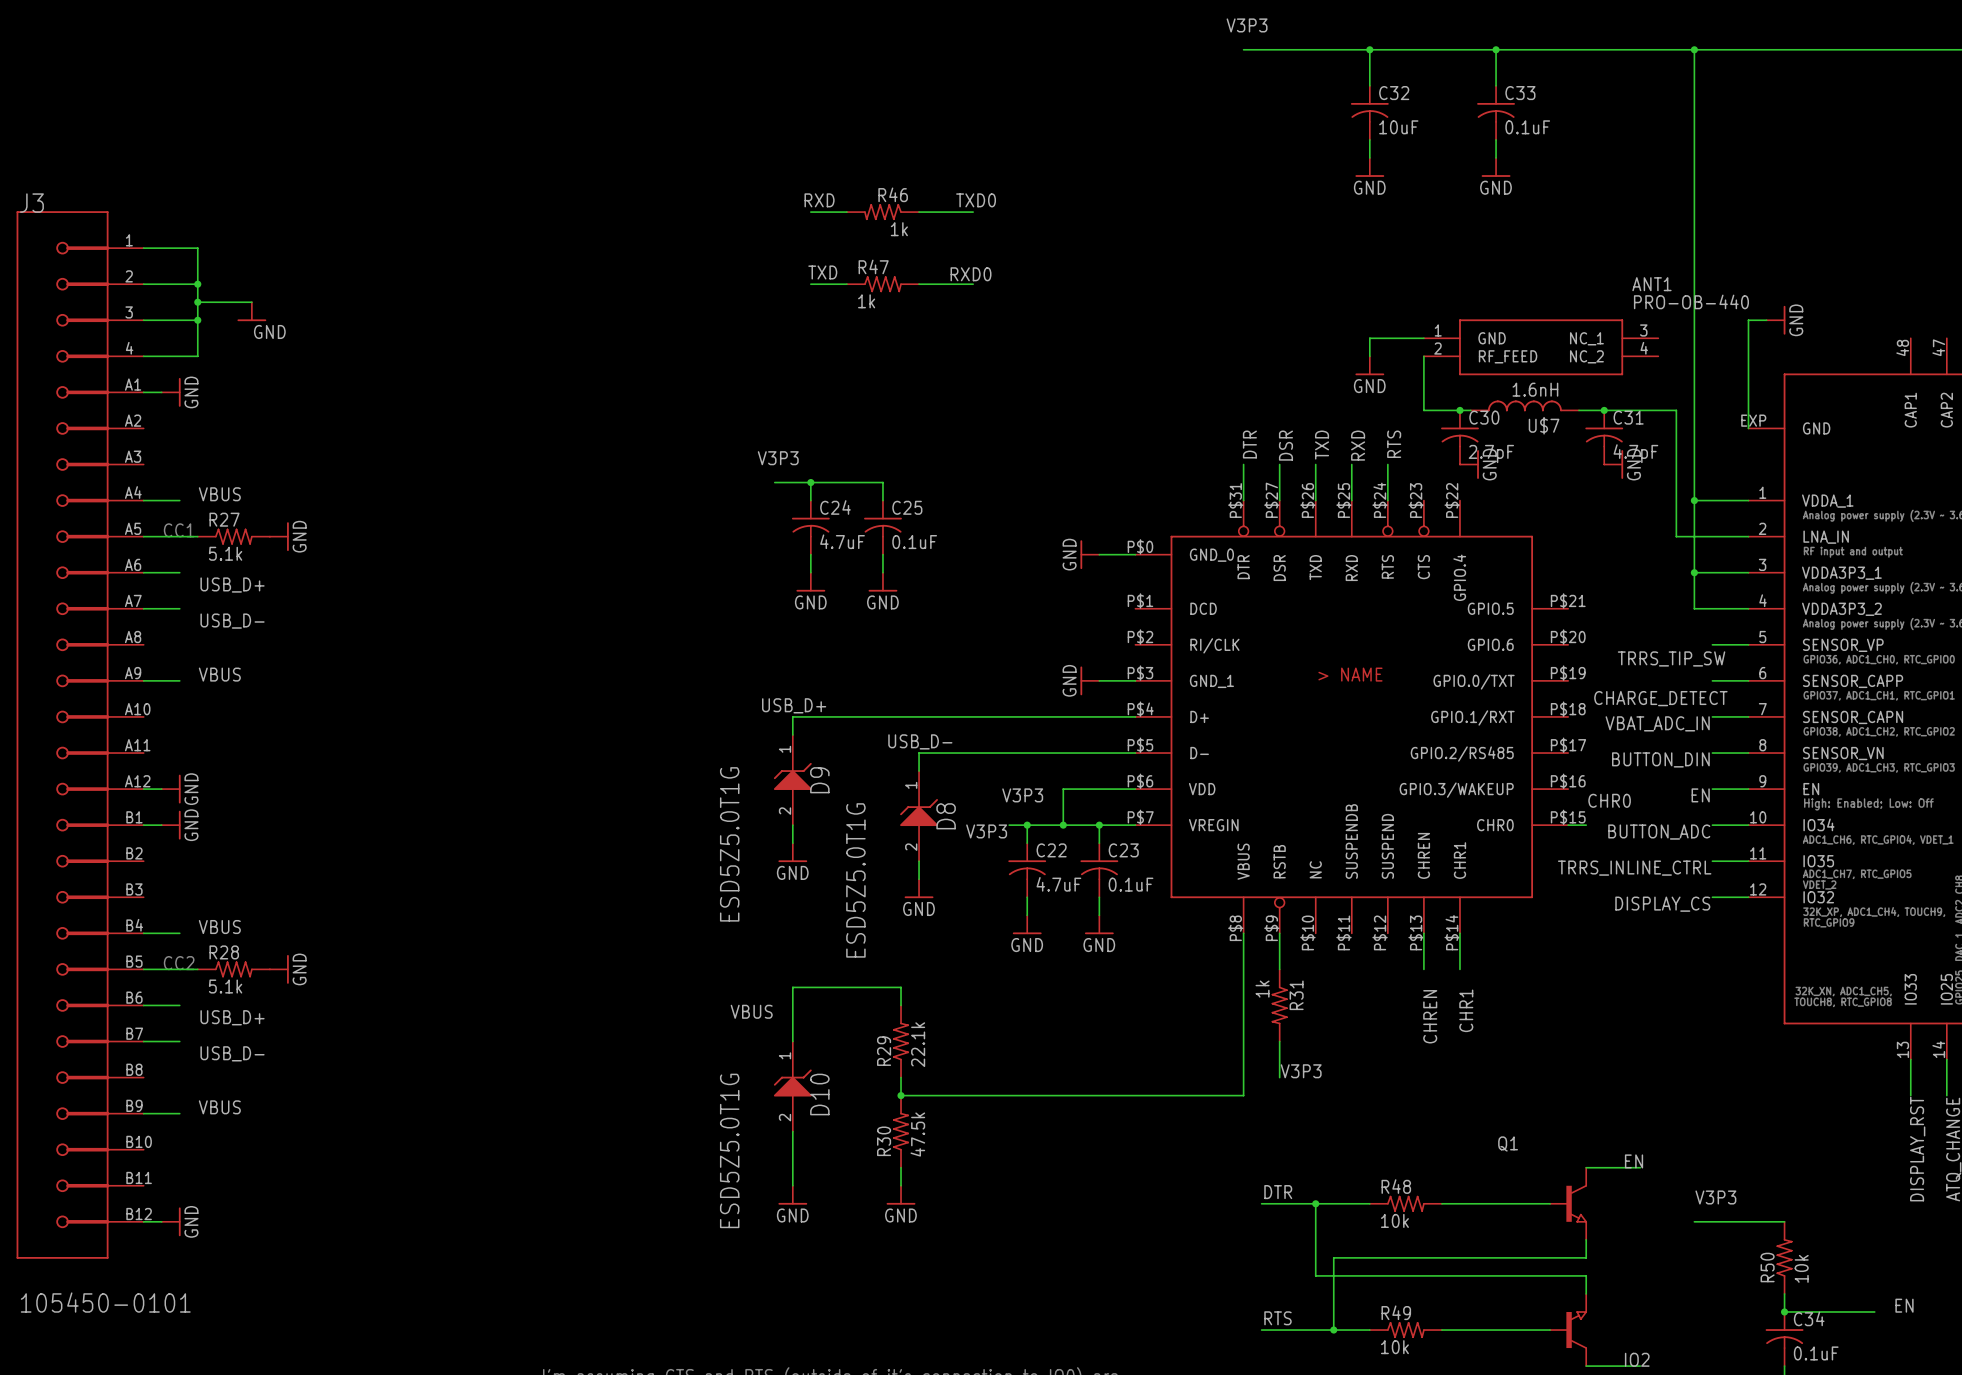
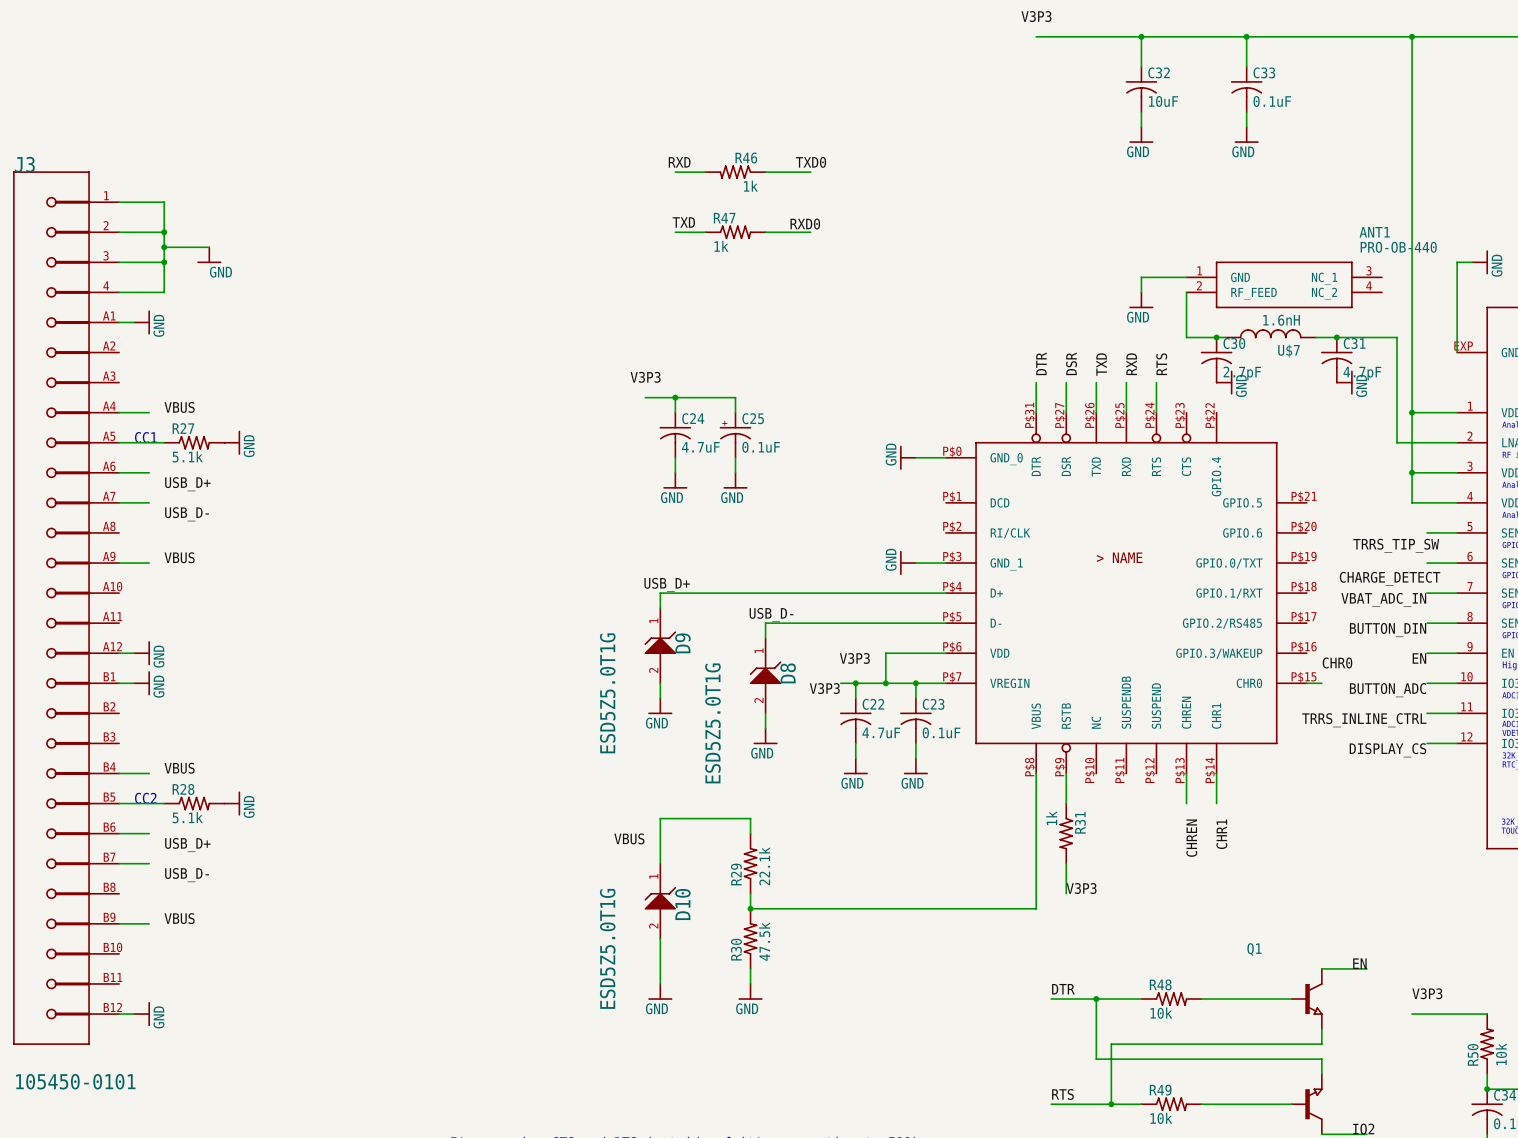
C25 symbol: [864, 500, 902, 555] -> [719, 412, 752, 458]

